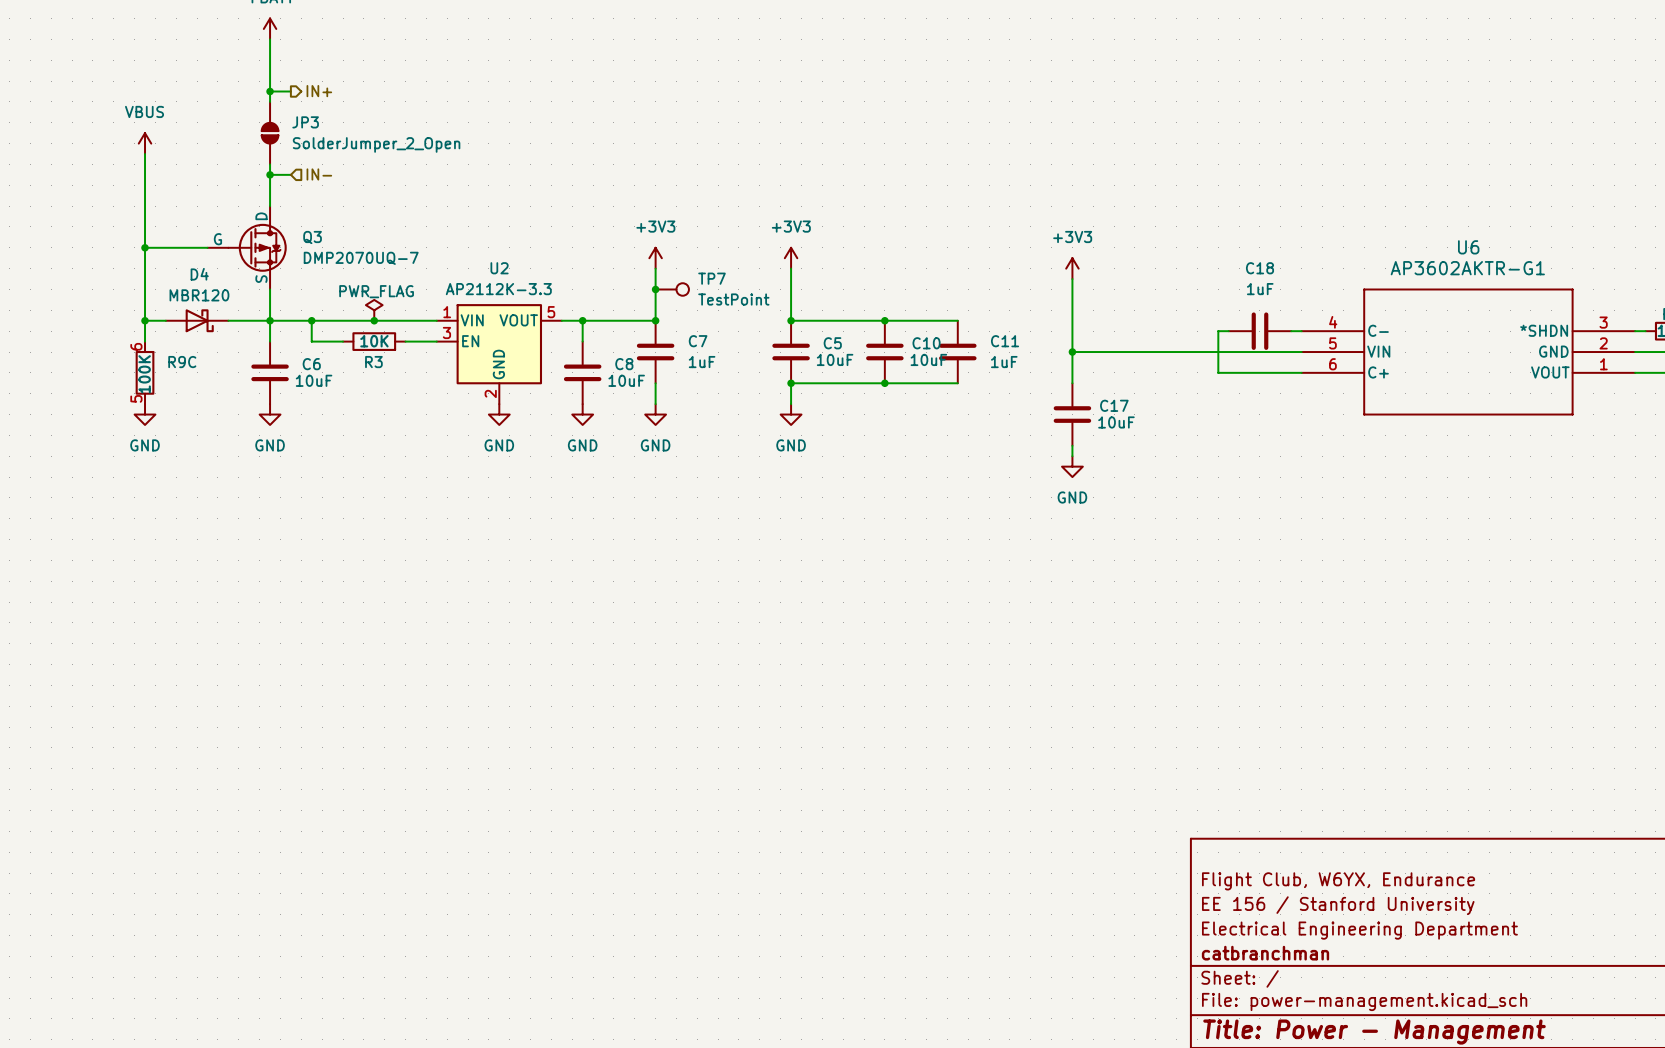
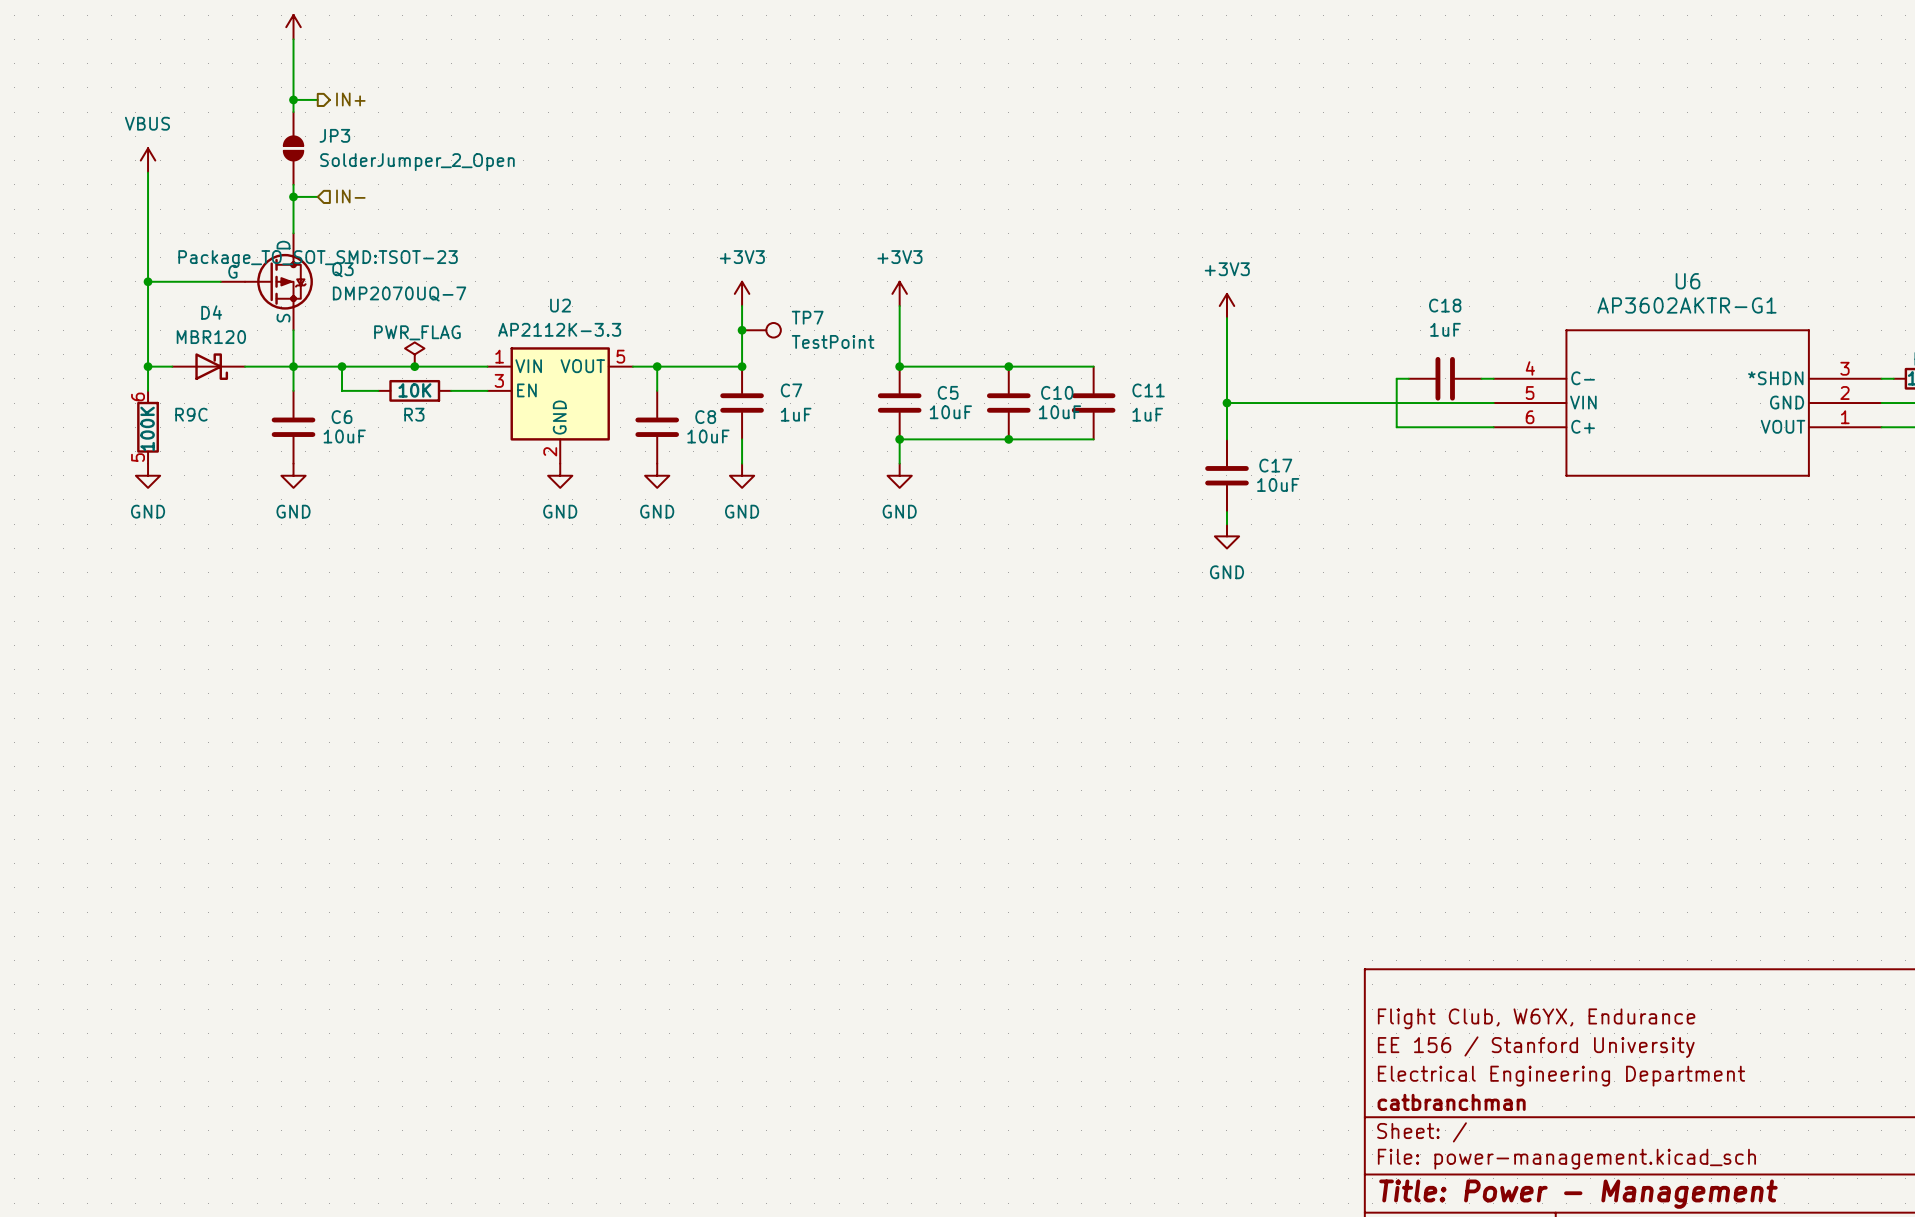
Q3 text: none -> Package_TO_SOT_SMD:TSOT-23 (318, 259)

